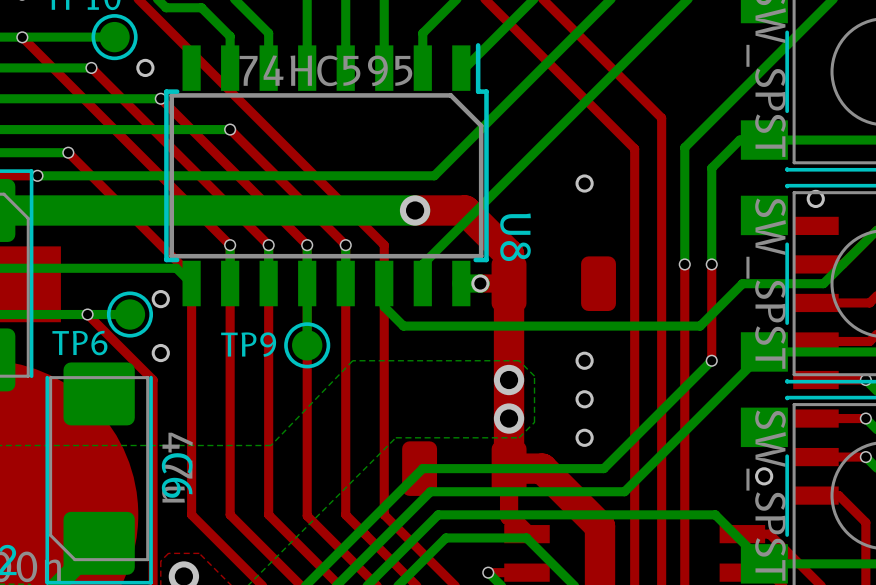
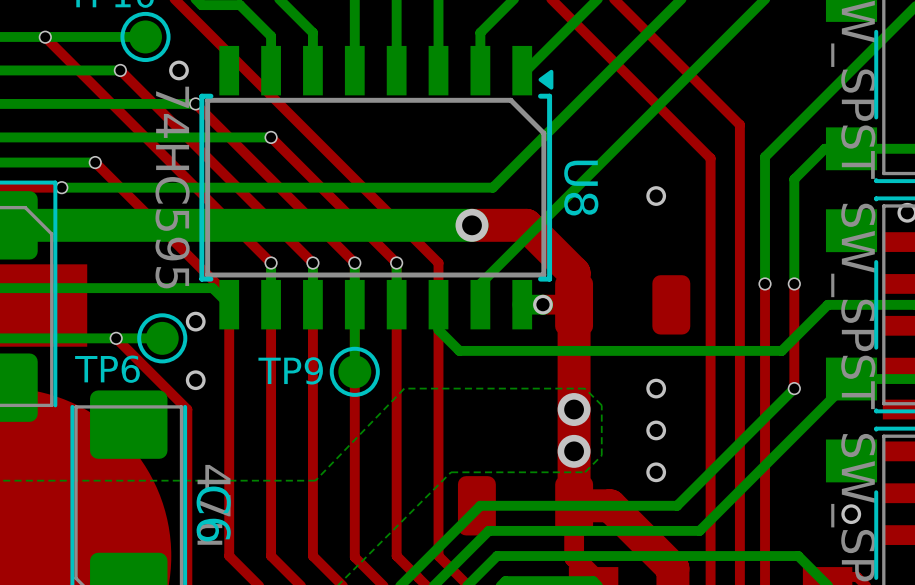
U8 footprint: [164, 43, 489, 307] -> [199, 45, 554, 330]
U8 value rotation: 0° (325, 70) -> 90° clockwise (172, 187)
U8 name position: U8 (515, 237) -> U8 (581, 188)

